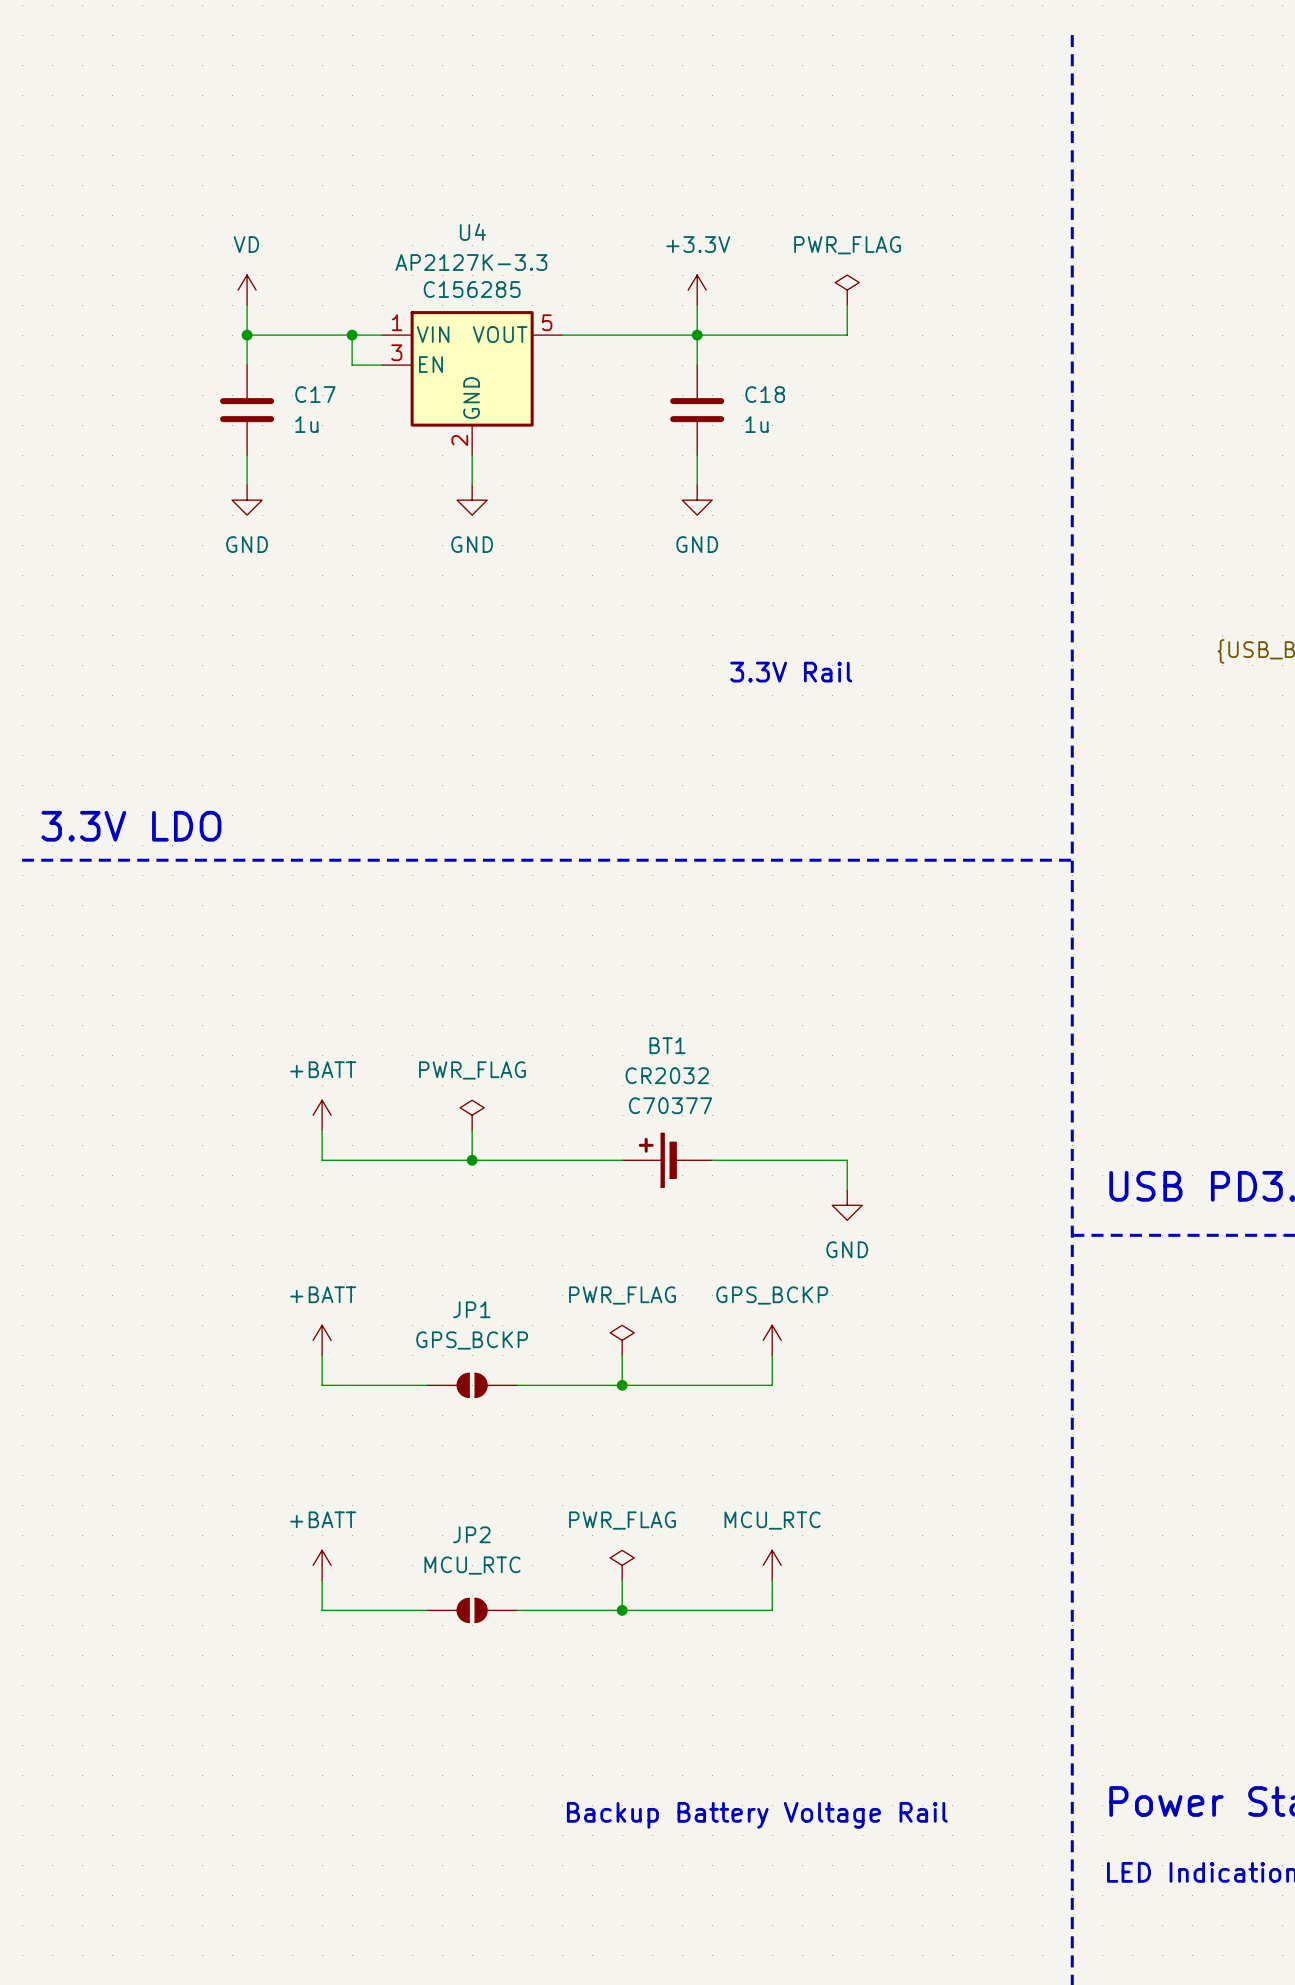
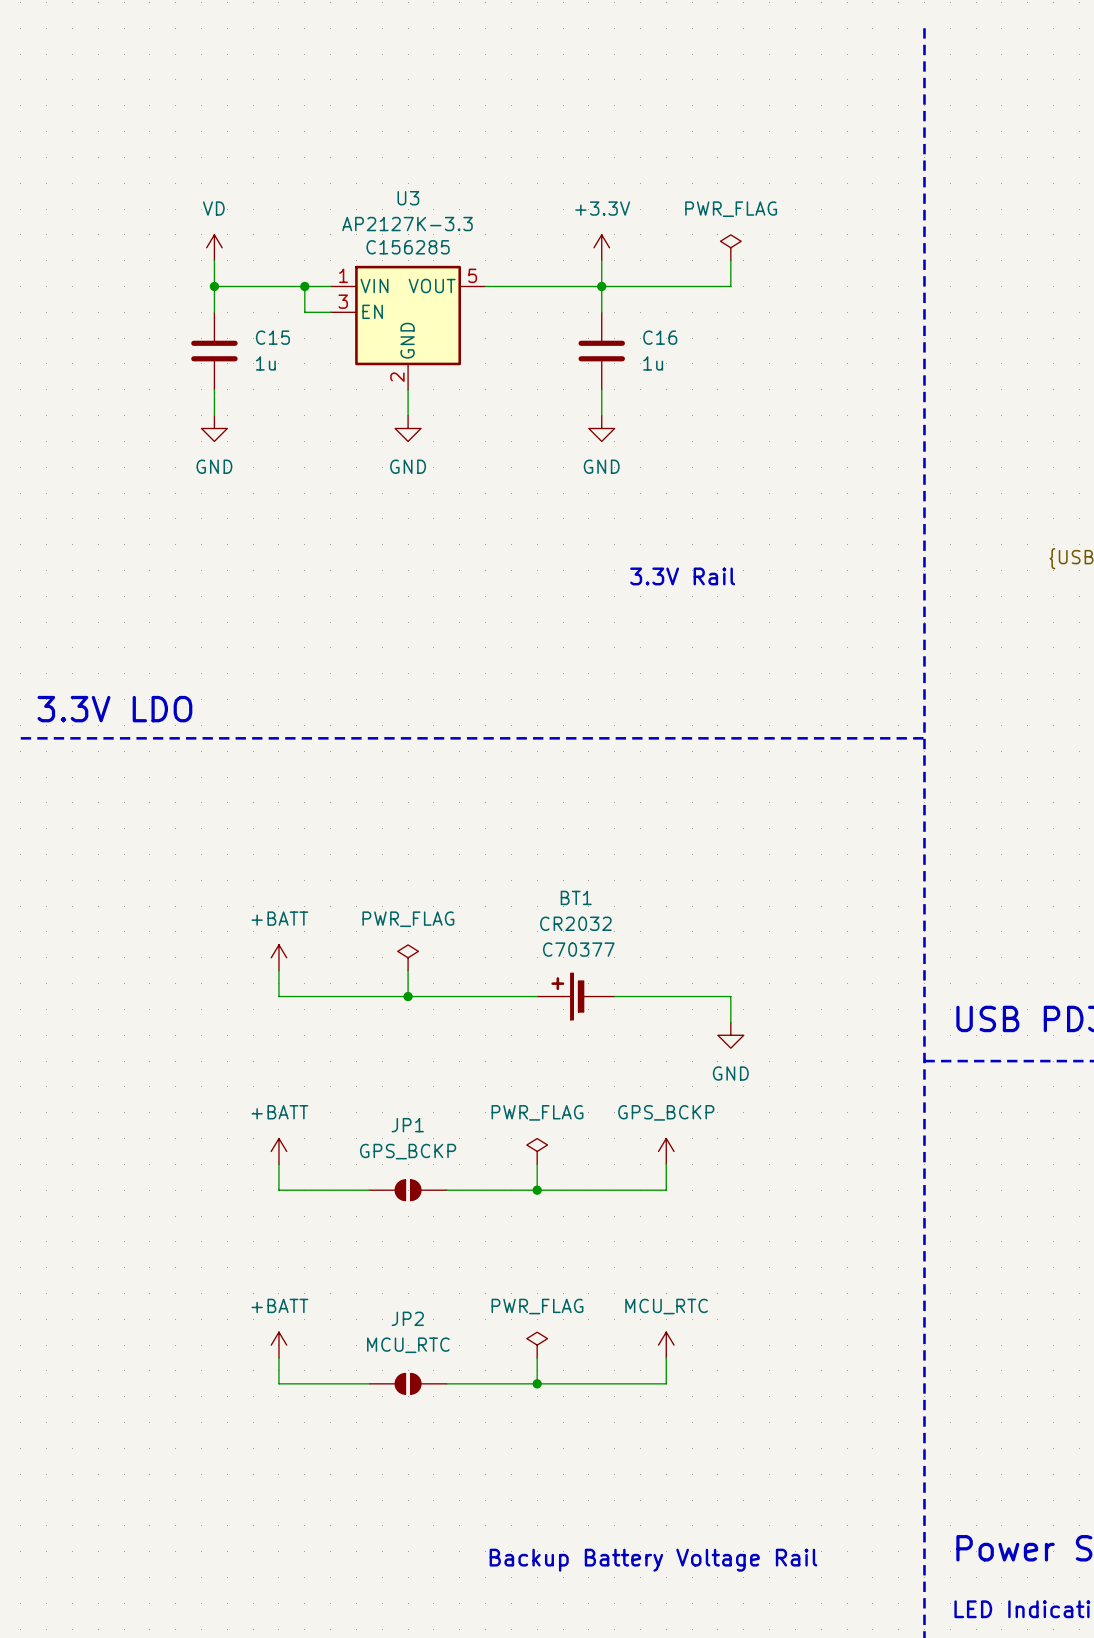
U4 name: U4 (472, 232) -> U3 (408, 198)
C17 name: C17 (315, 394) -> C15 (272, 337)
C18 name: C18 (765, 394) -> C16 (660, 337)

